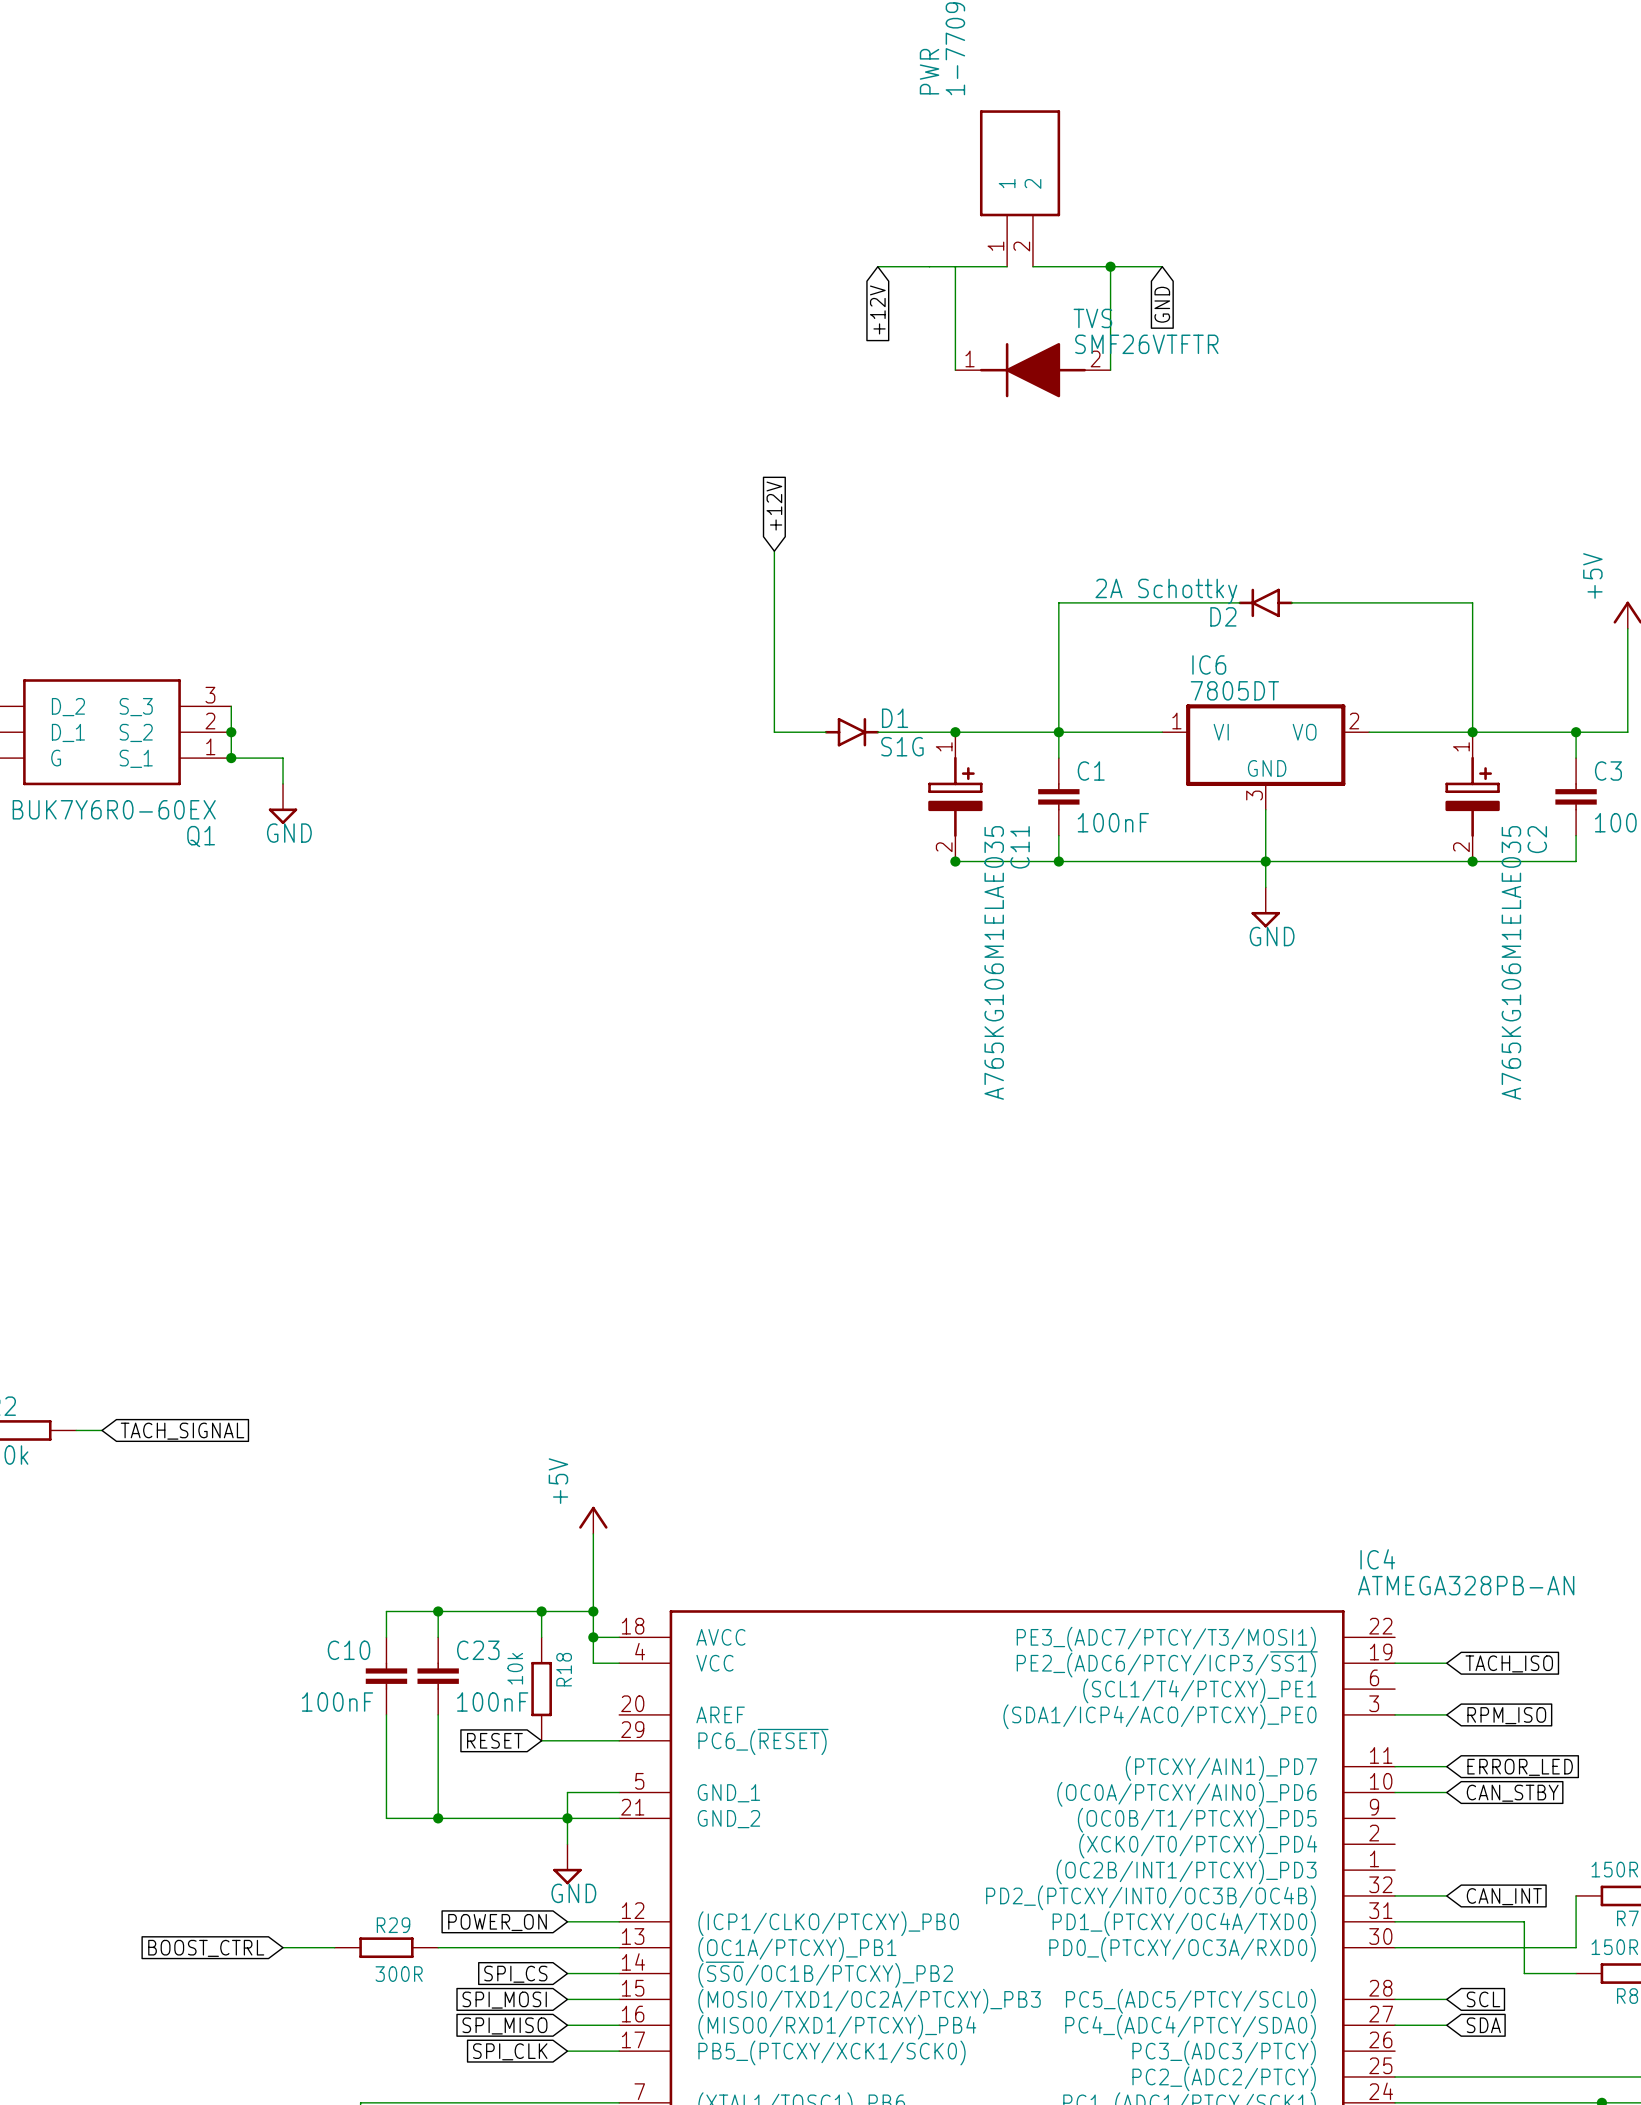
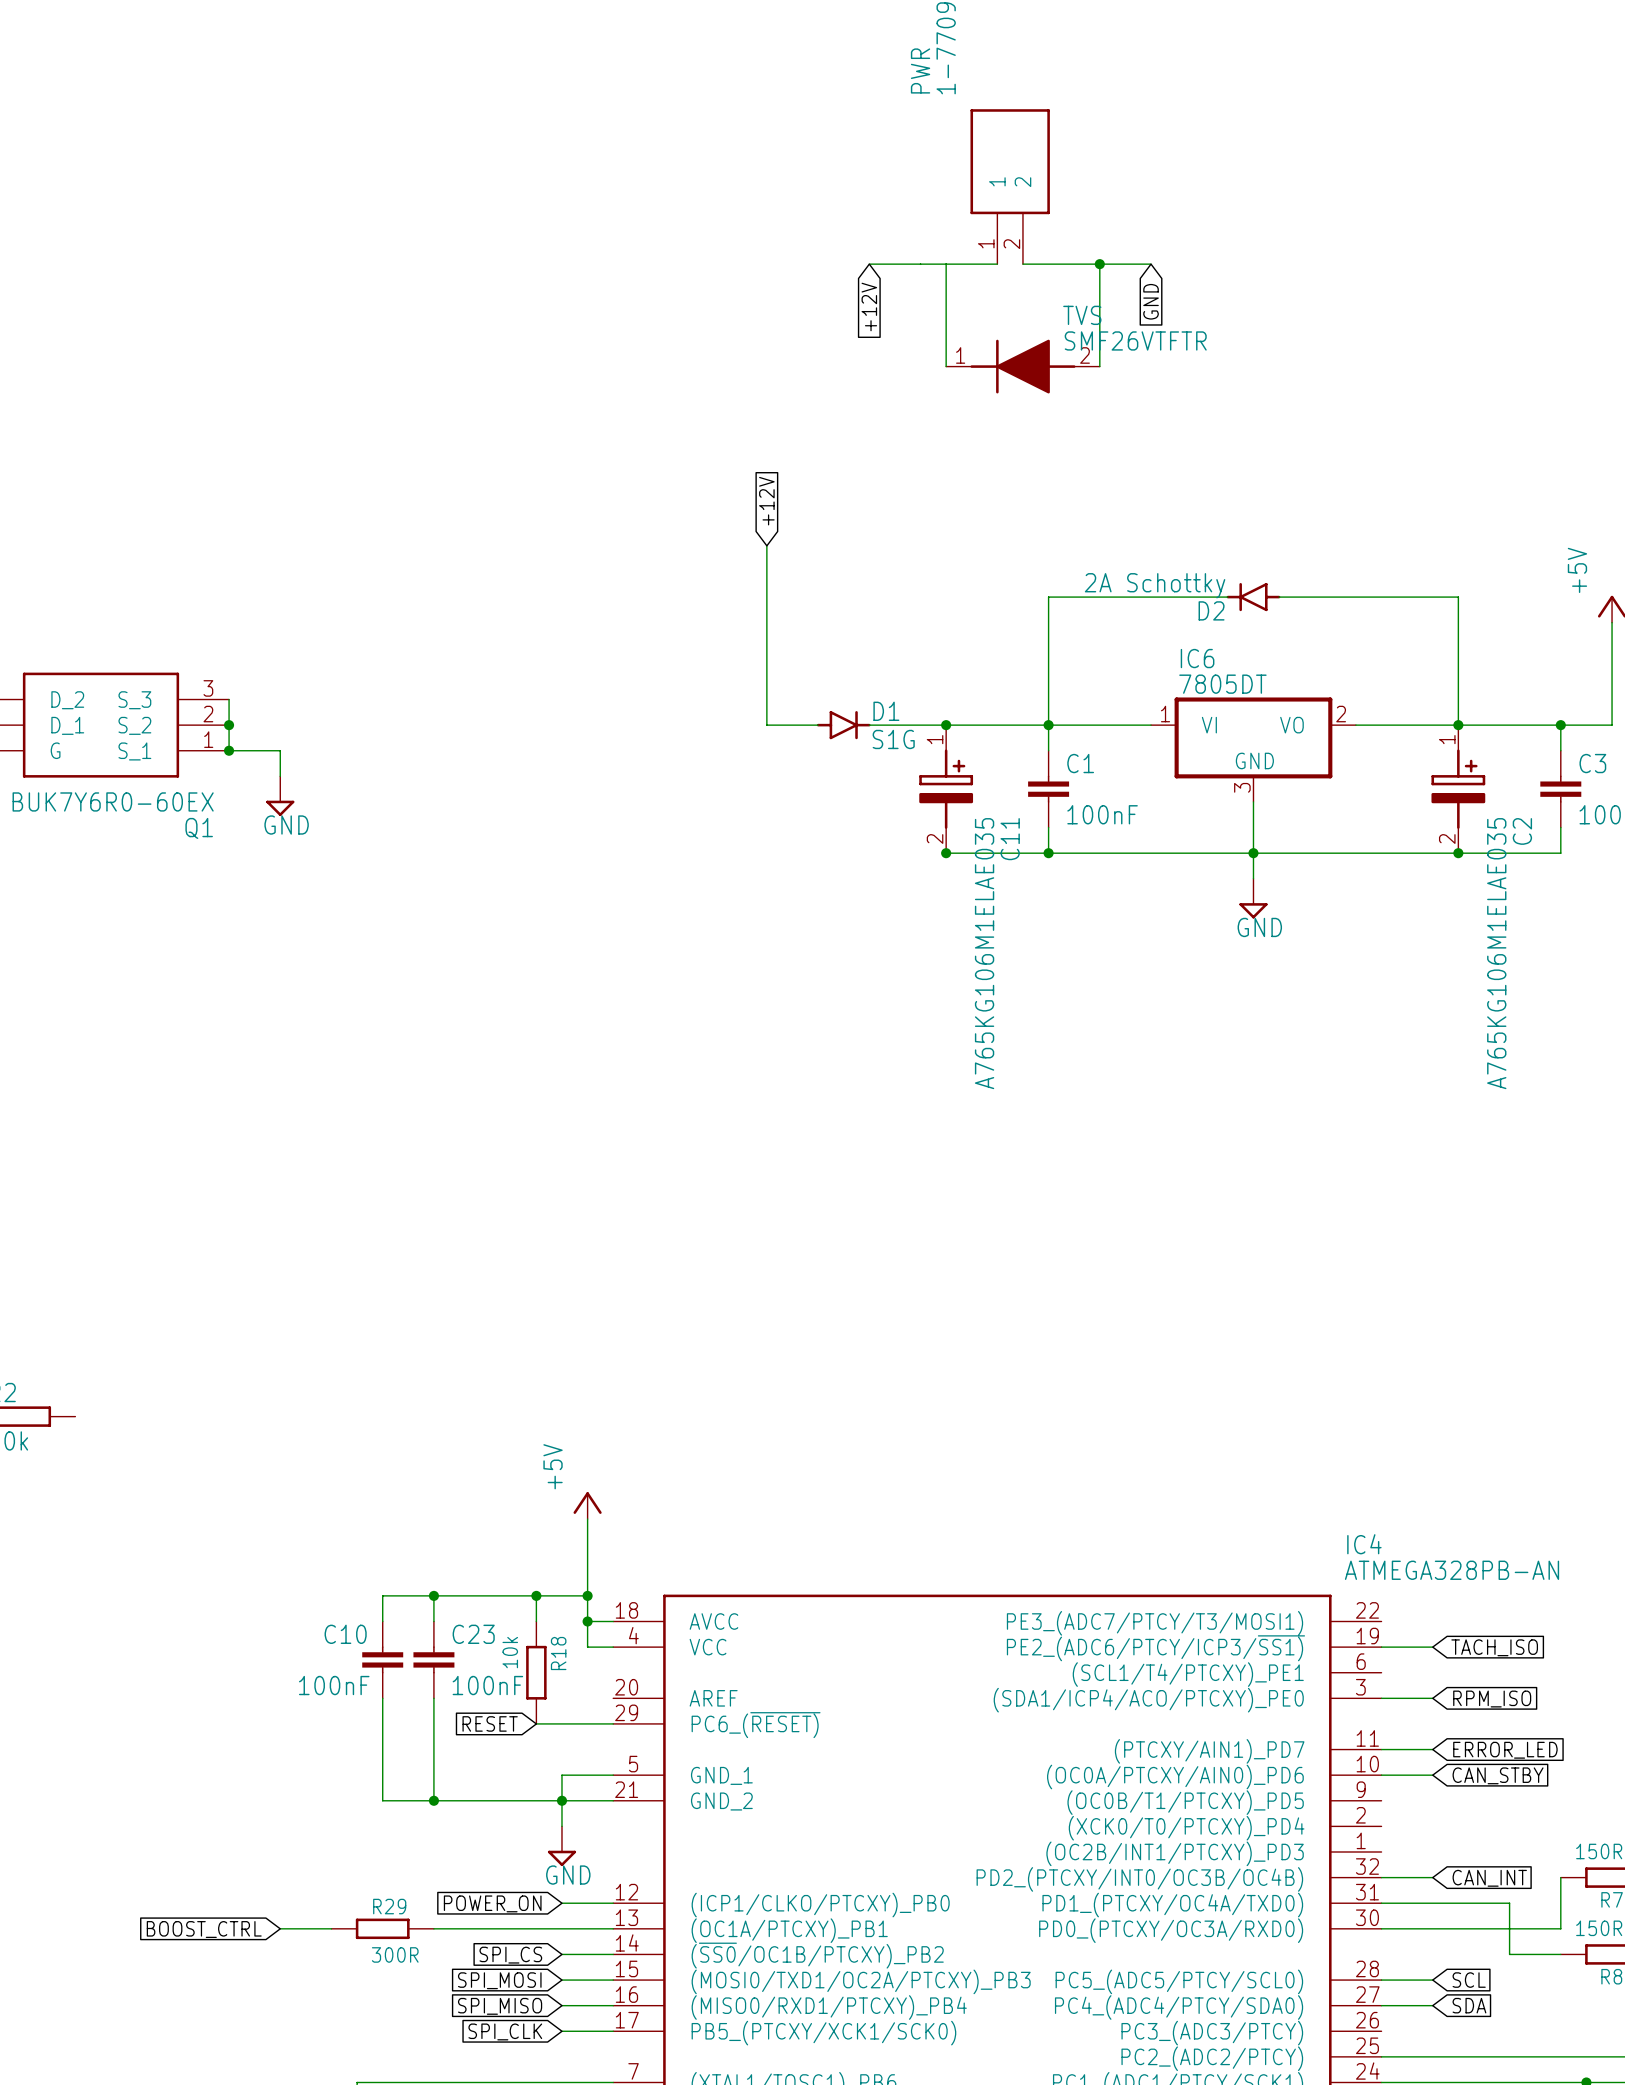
wire: (76, 1430) (101, 1430) -> none
global label: TACH_SIGNAL (182, 1431) -> none

